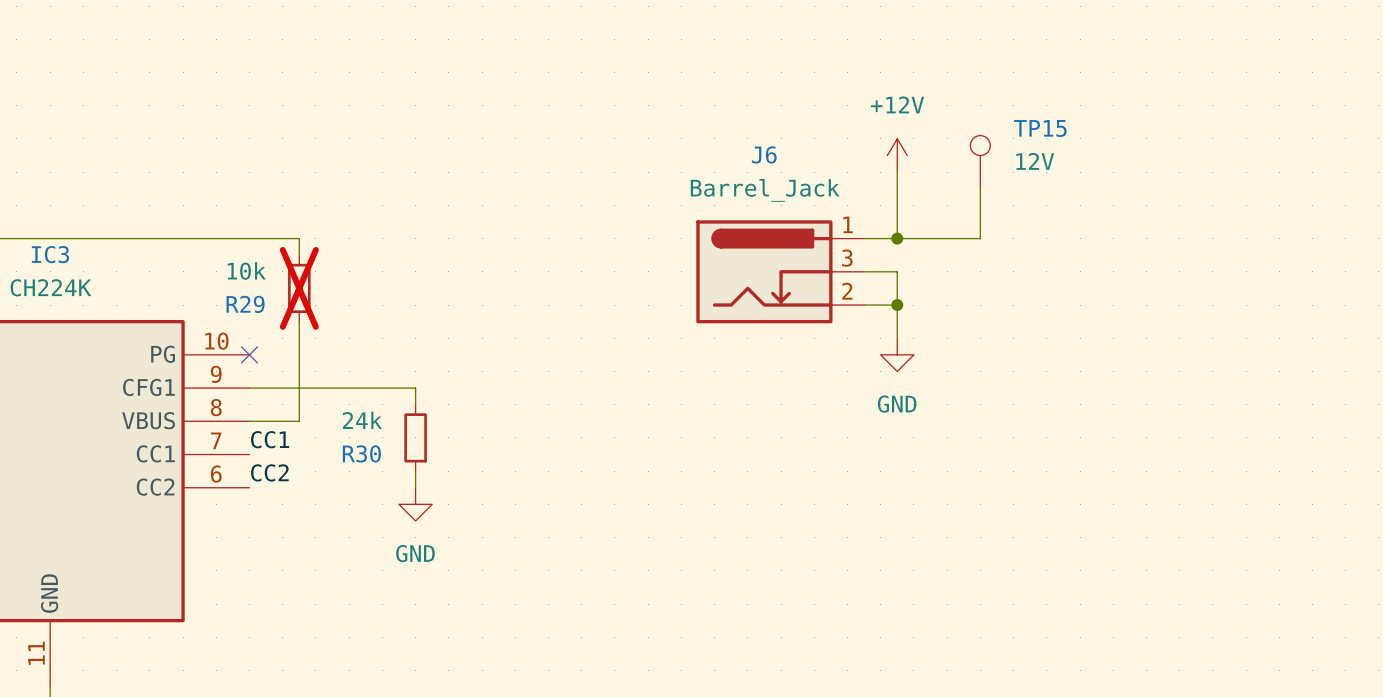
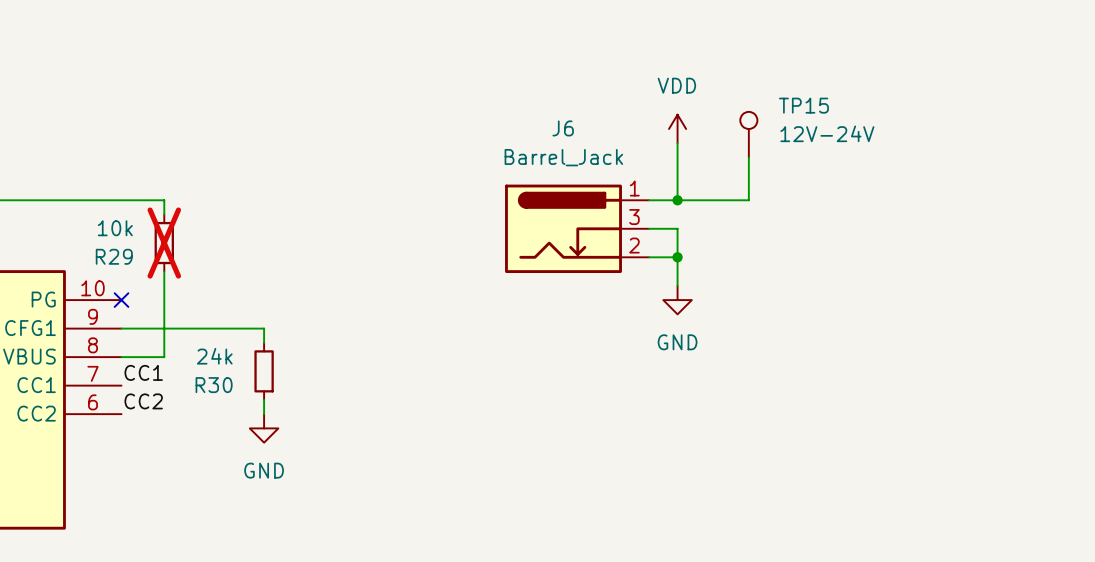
power symbol: +12V (897, 155) -> VDD (677, 128)
TP15 value: 12V (1035, 161) -> 12V-24V (827, 133)

